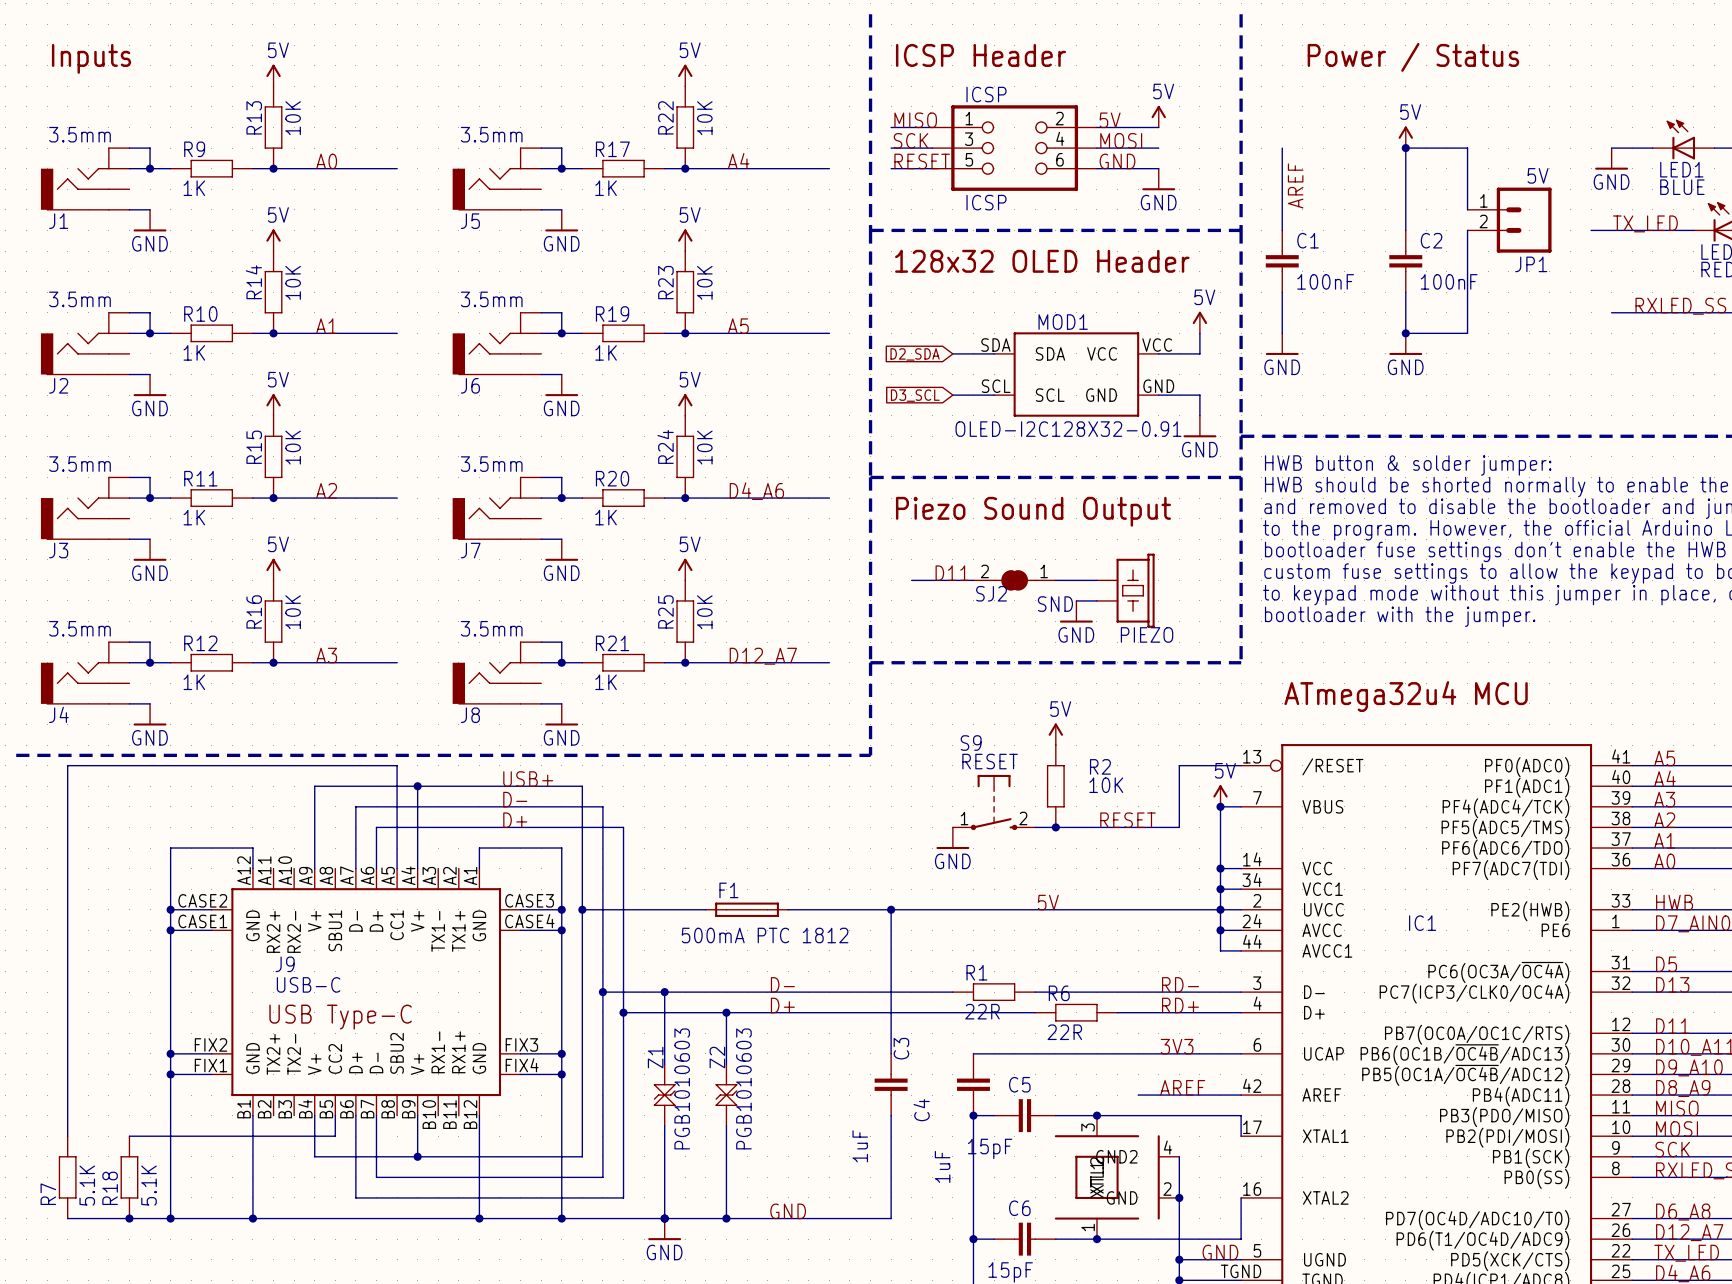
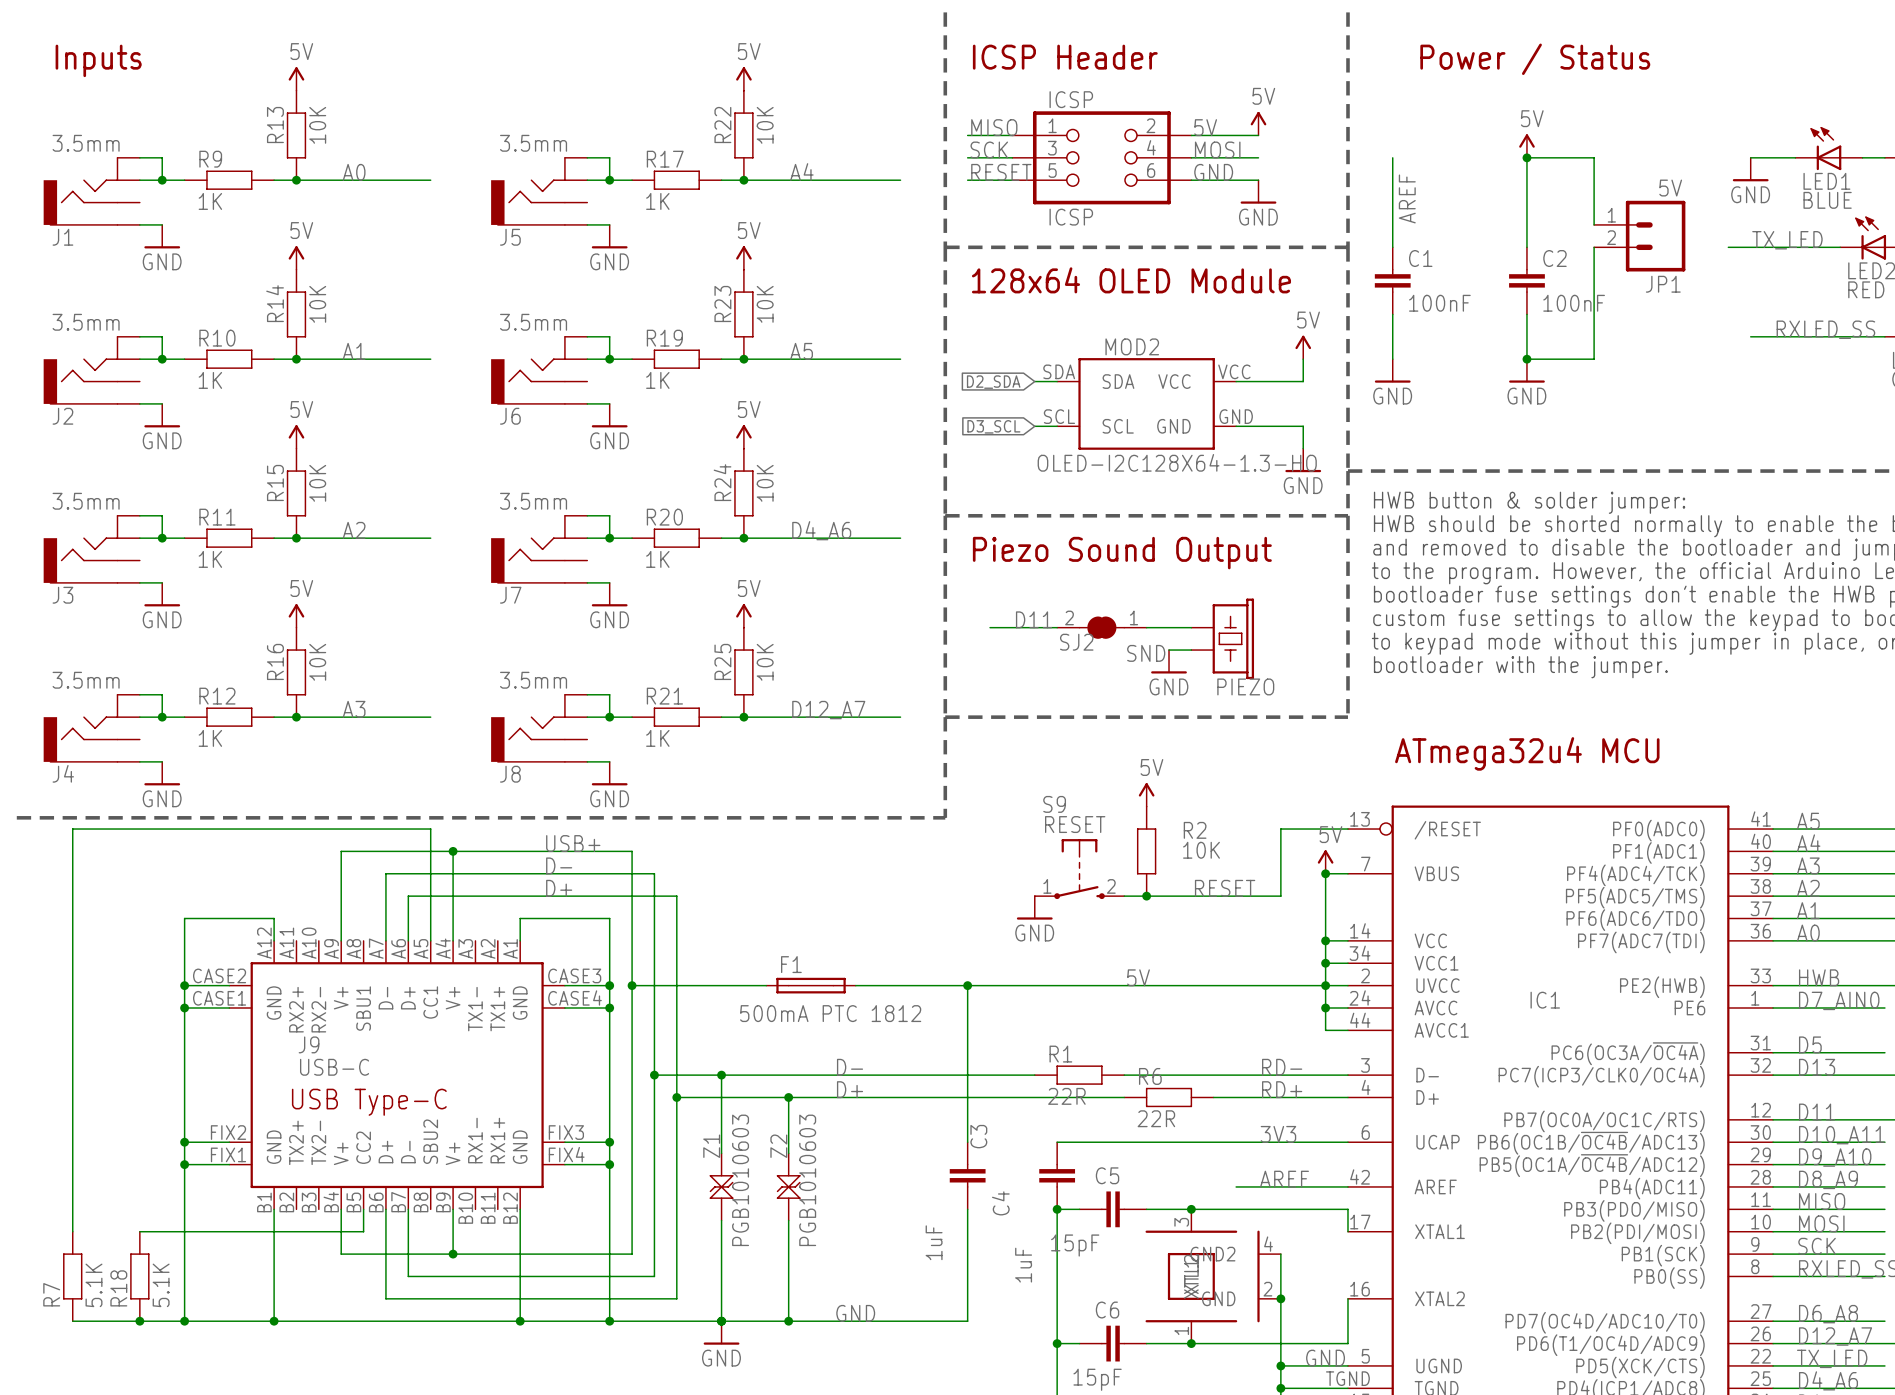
text: 128x32 OLED Header (1042, 261) -> 128x64 OLED Module (1131, 280)
MOD2: none -> OLED-I2C128X64-1.3-HO (1146, 403)
MOD1: OLED-I2C128X32-0.91 (1076, 374) -> none

